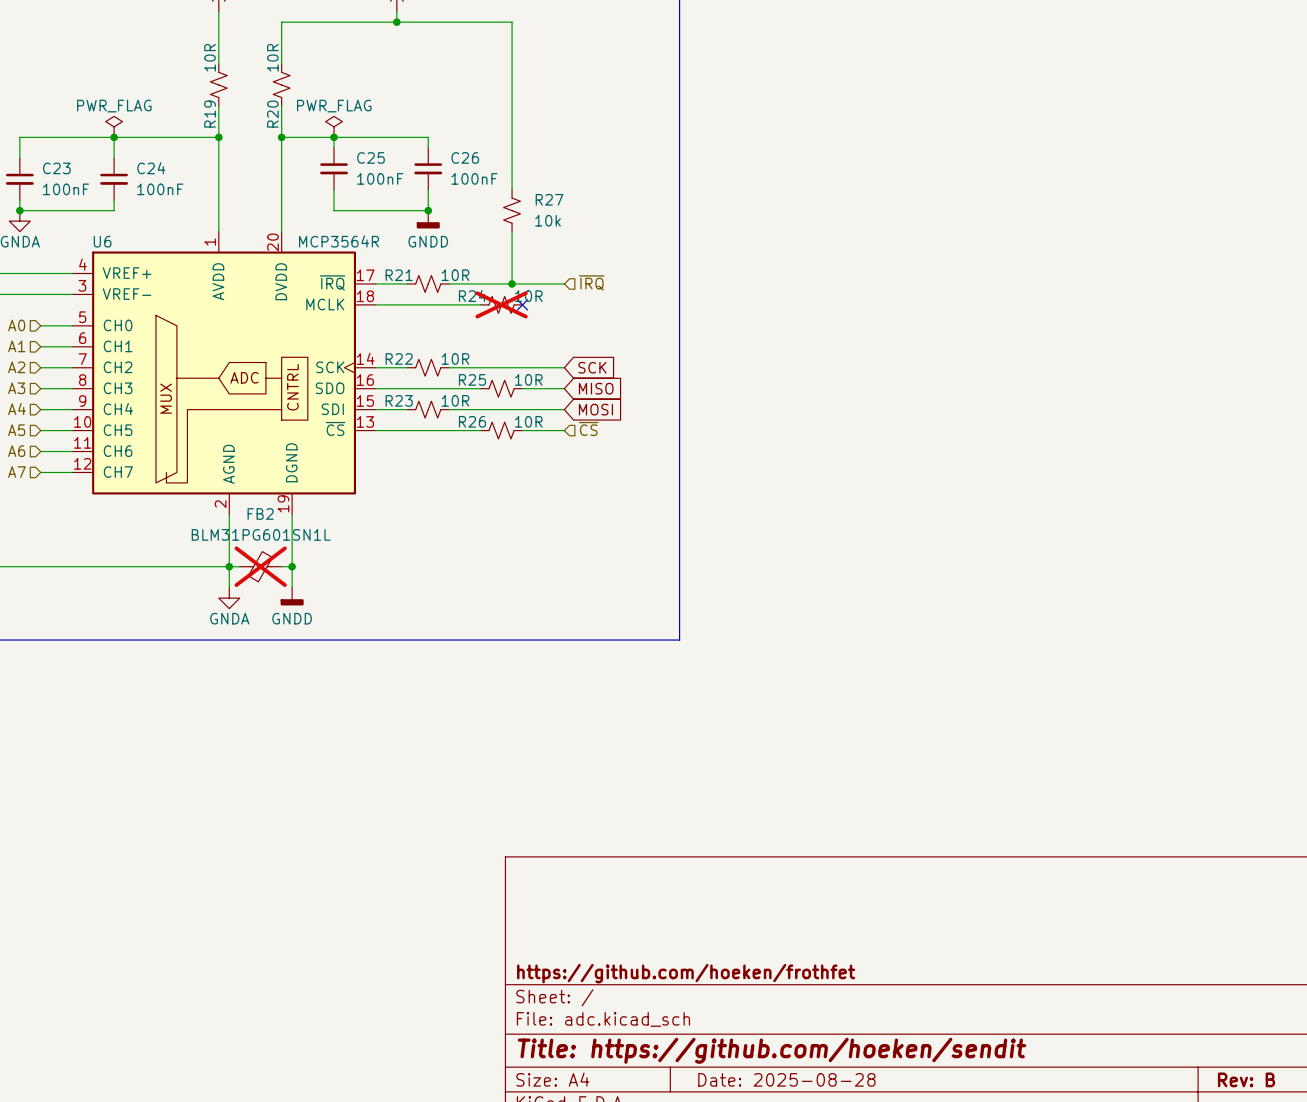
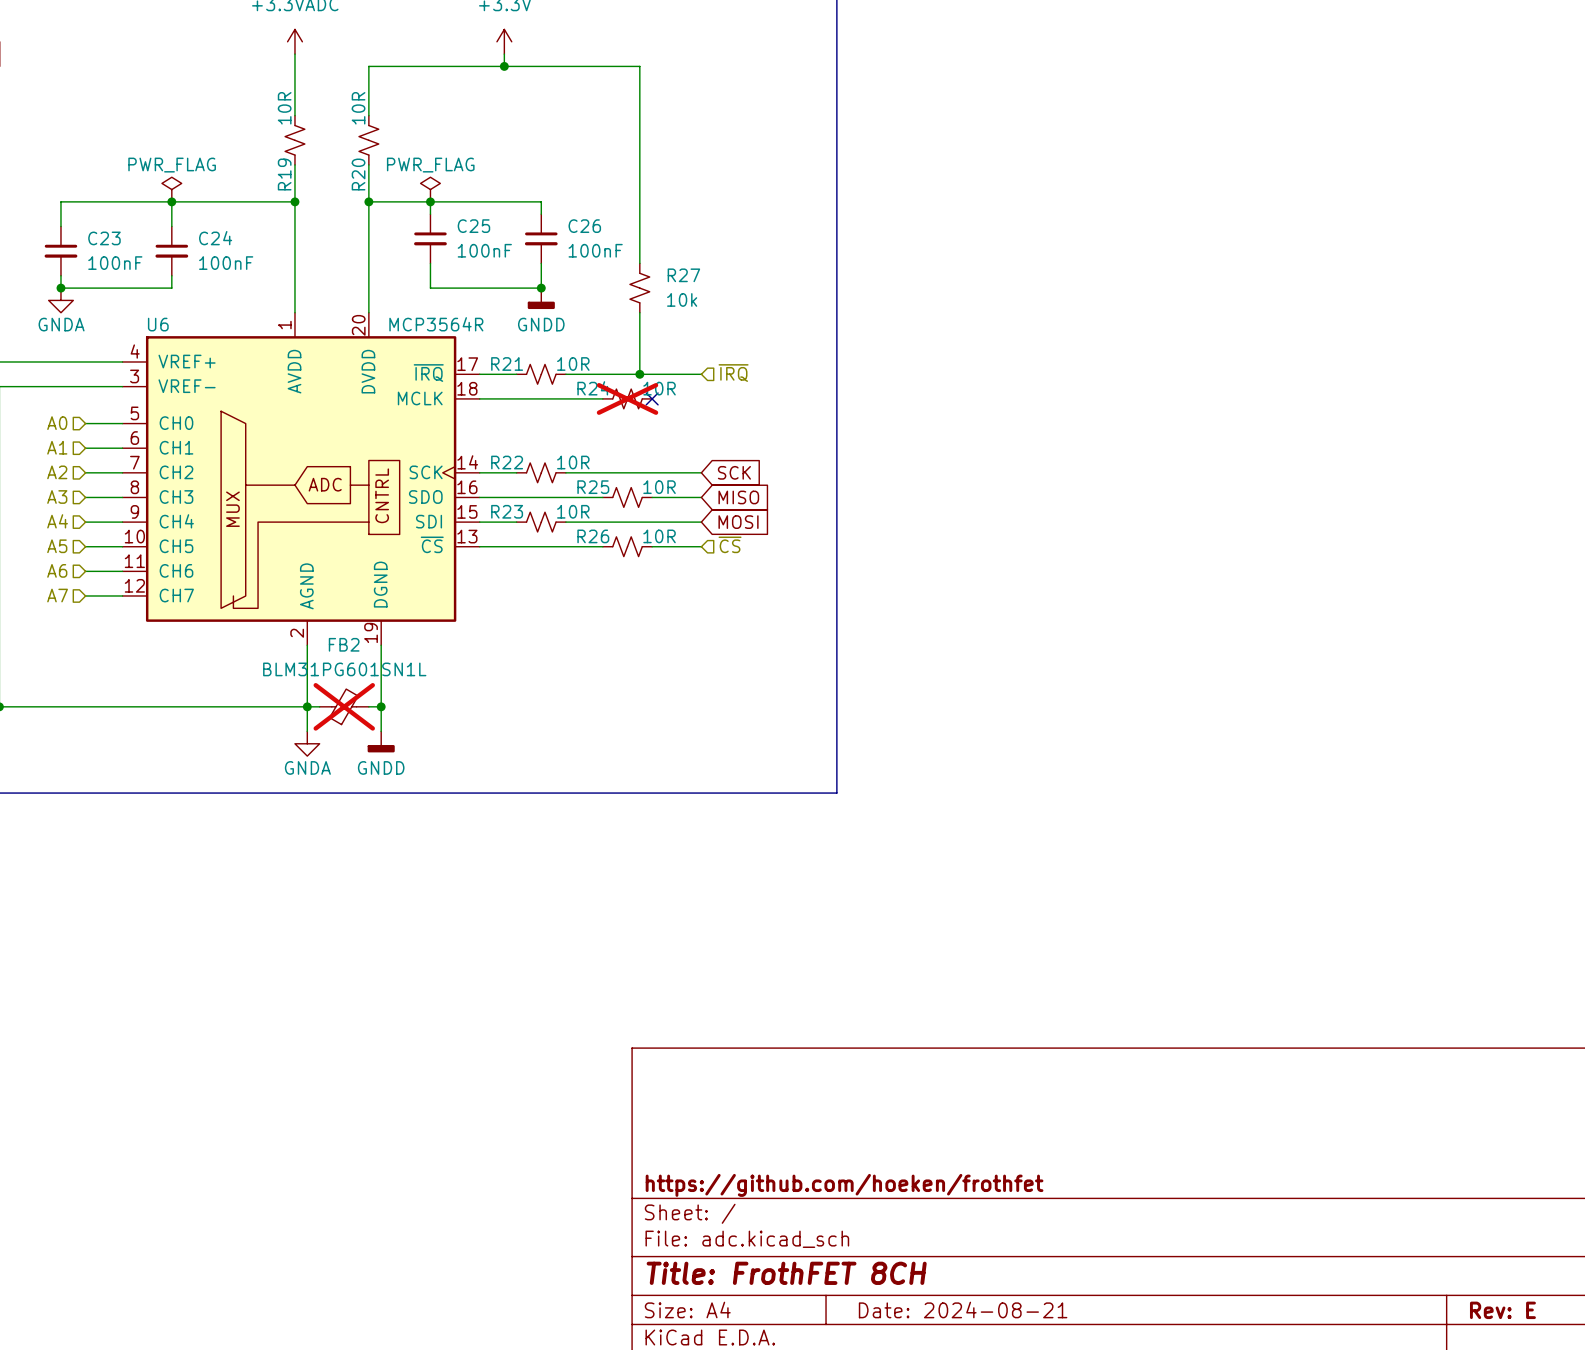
title block: Title: https://github.com/hoeken/sendit (772, 1050) -> Title: FrothFET 8CH (786, 1273)
title block: Date: 2025-08-28 (786, 1079) -> Date: 2024-08-21 (963, 1310)
title block: Rev: B (1246, 1079) -> Rev: E (1502, 1310)

